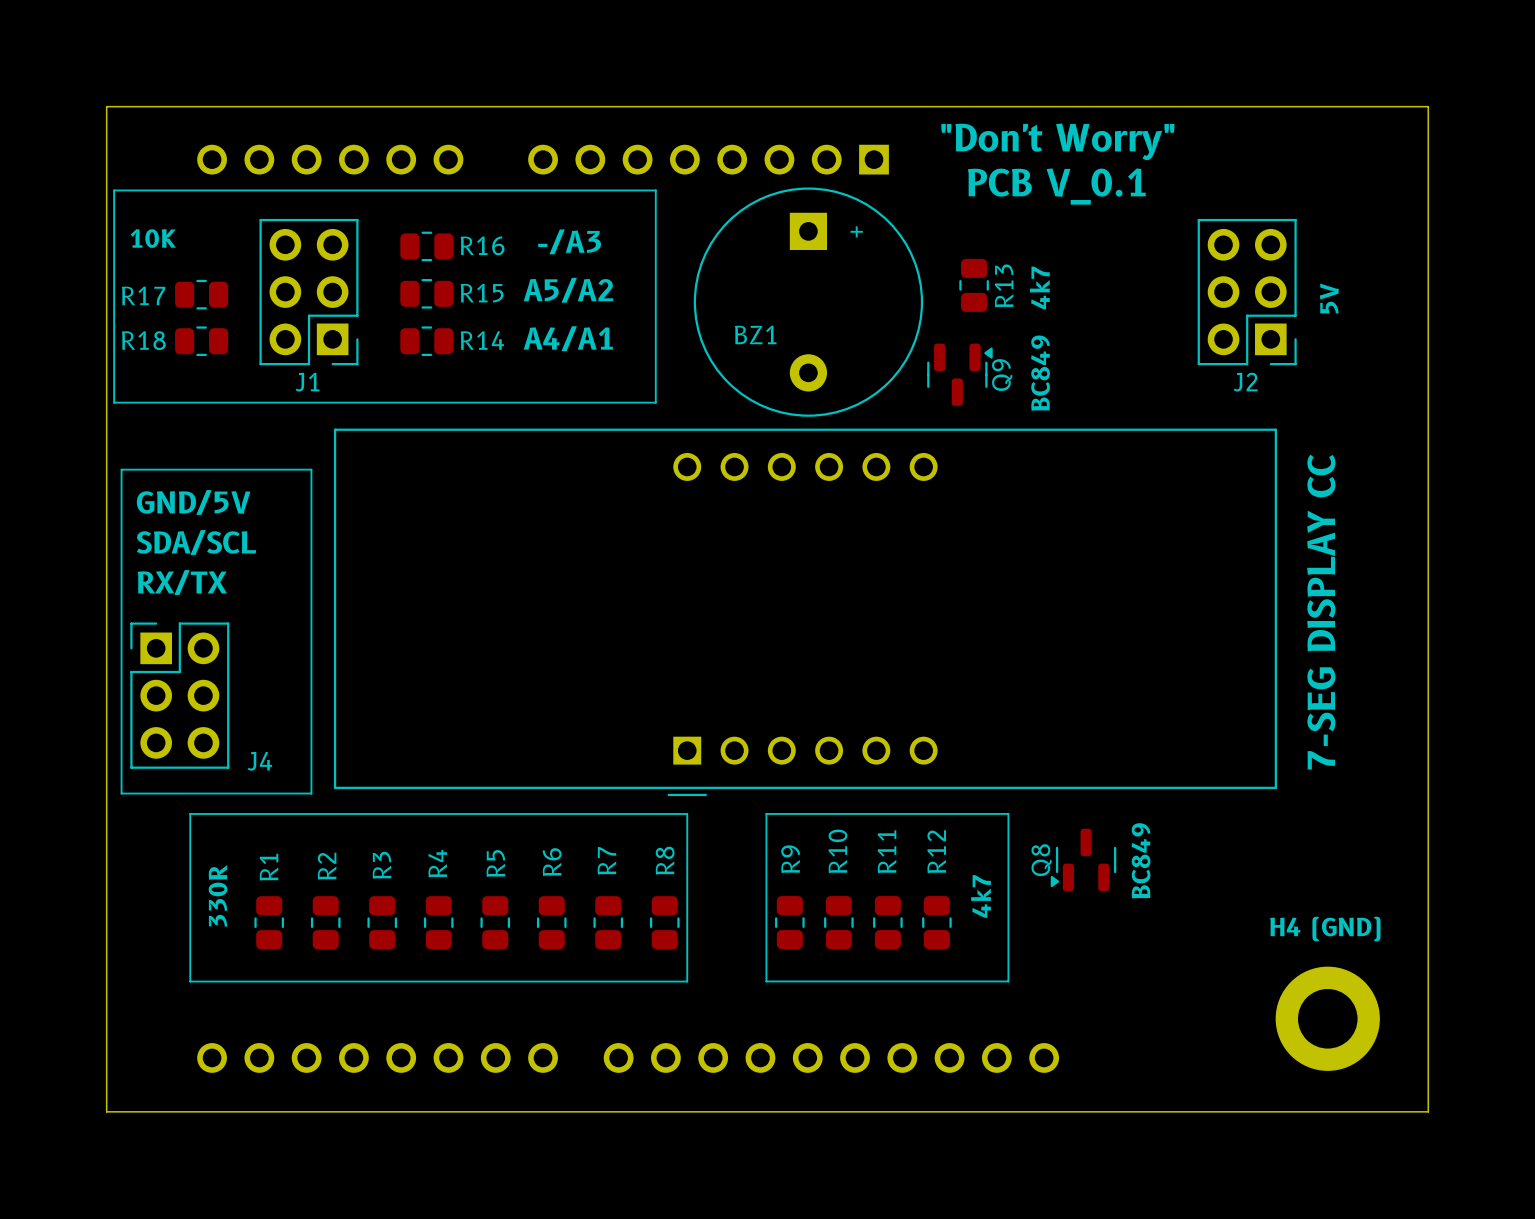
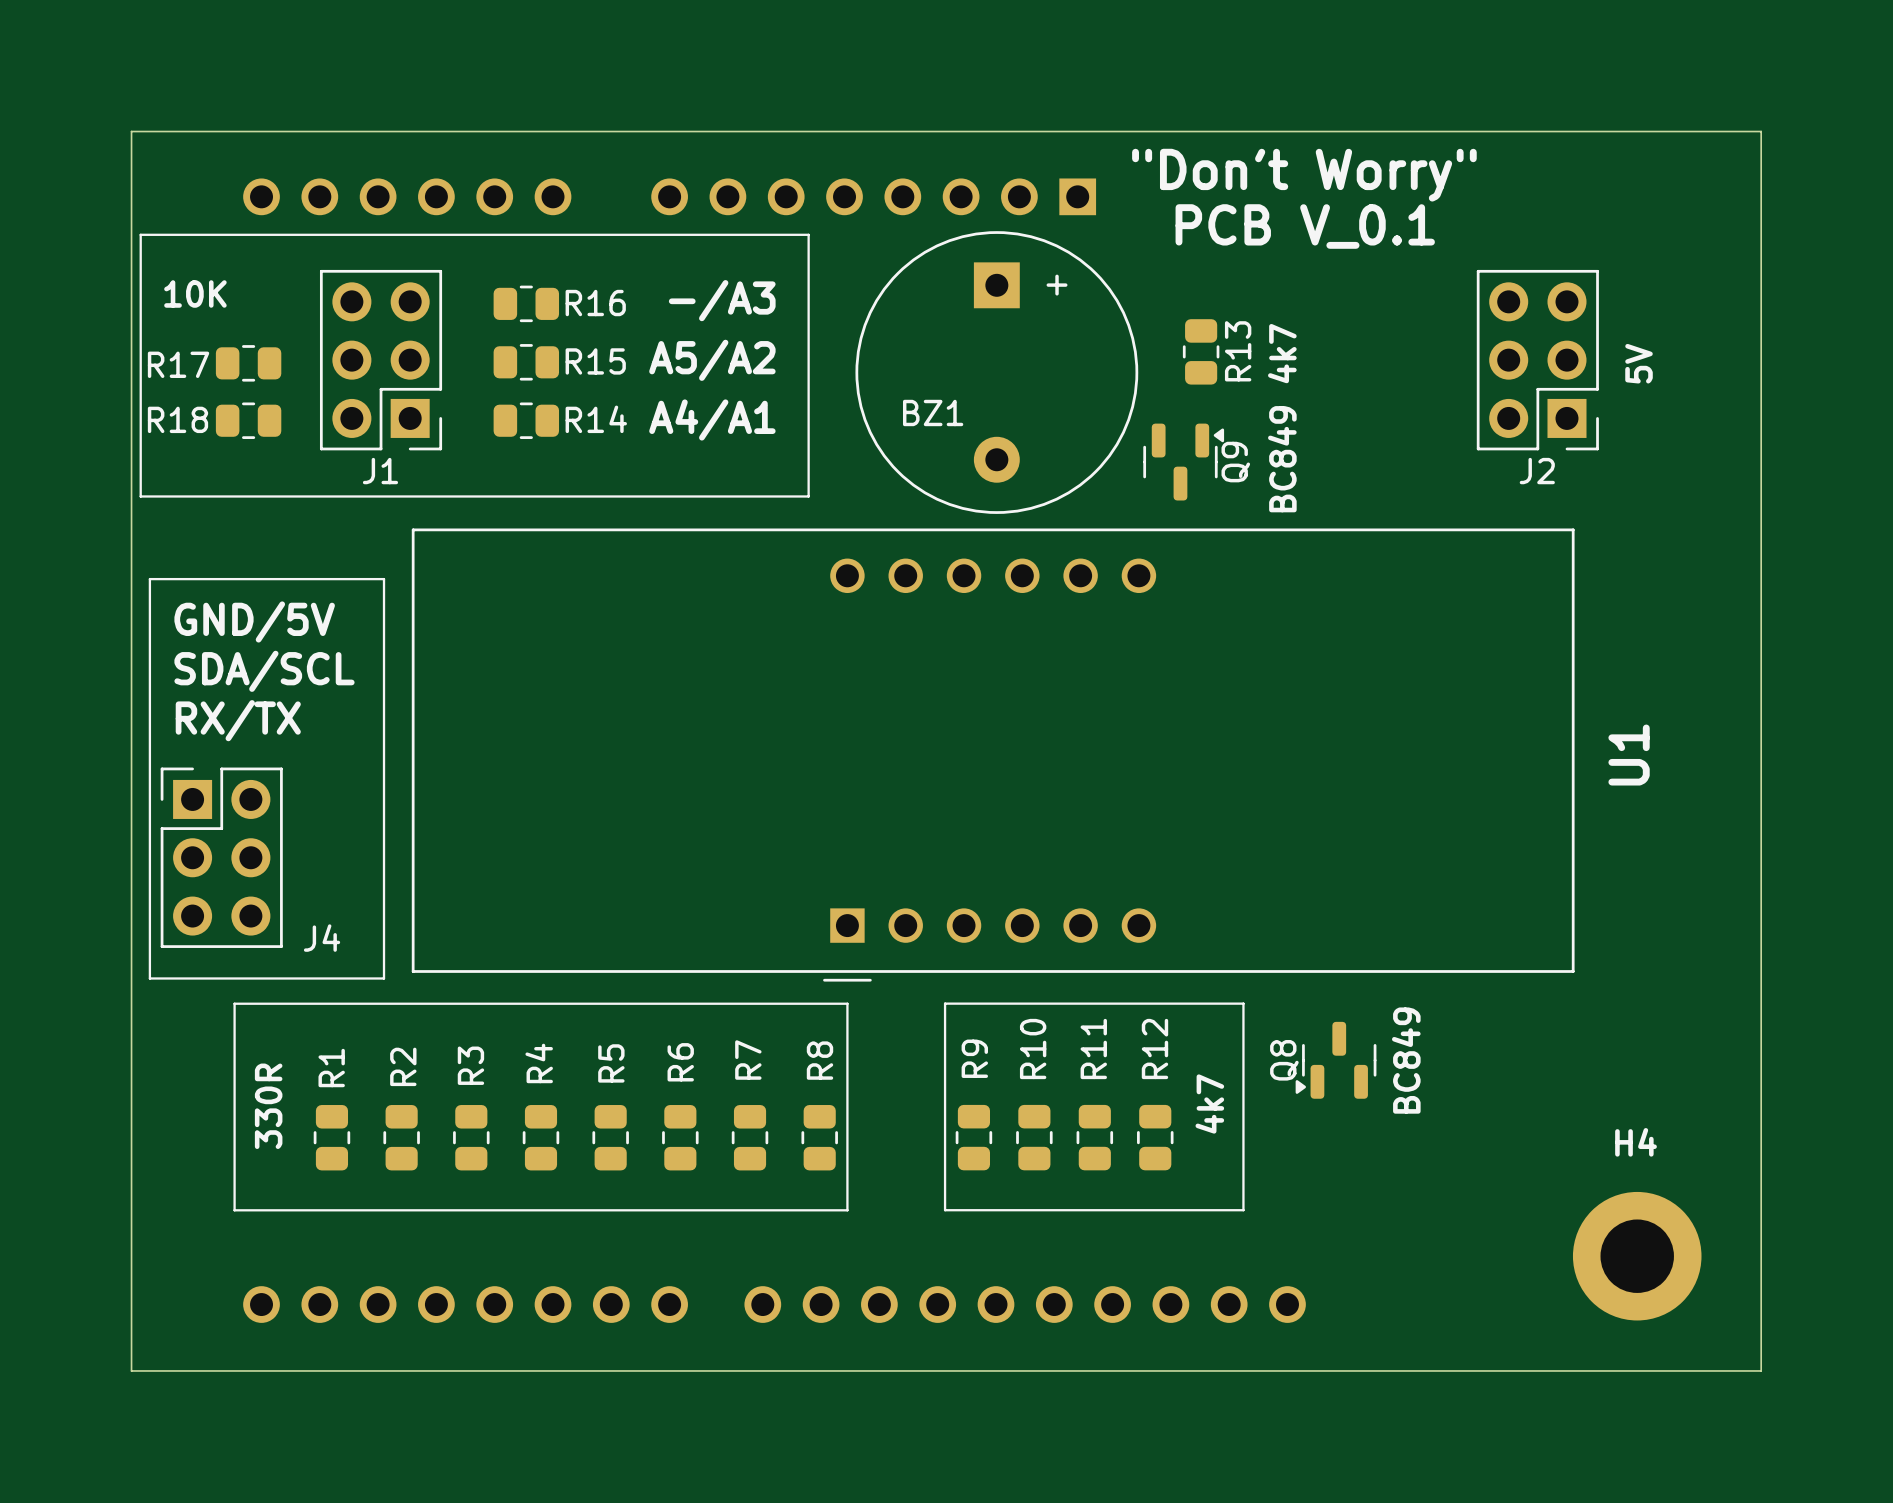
7-SEG DISPLAY CC name: 7-SEG DISPLAY CC (1321, 612) -> U1 (1629, 755)
H4 (GND) name: H4 (GND) (1325, 928) -> H4 (1636, 1142)

